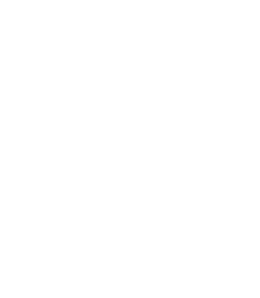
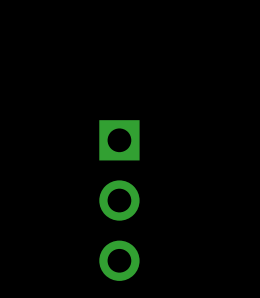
part: none -> (119, 200)

